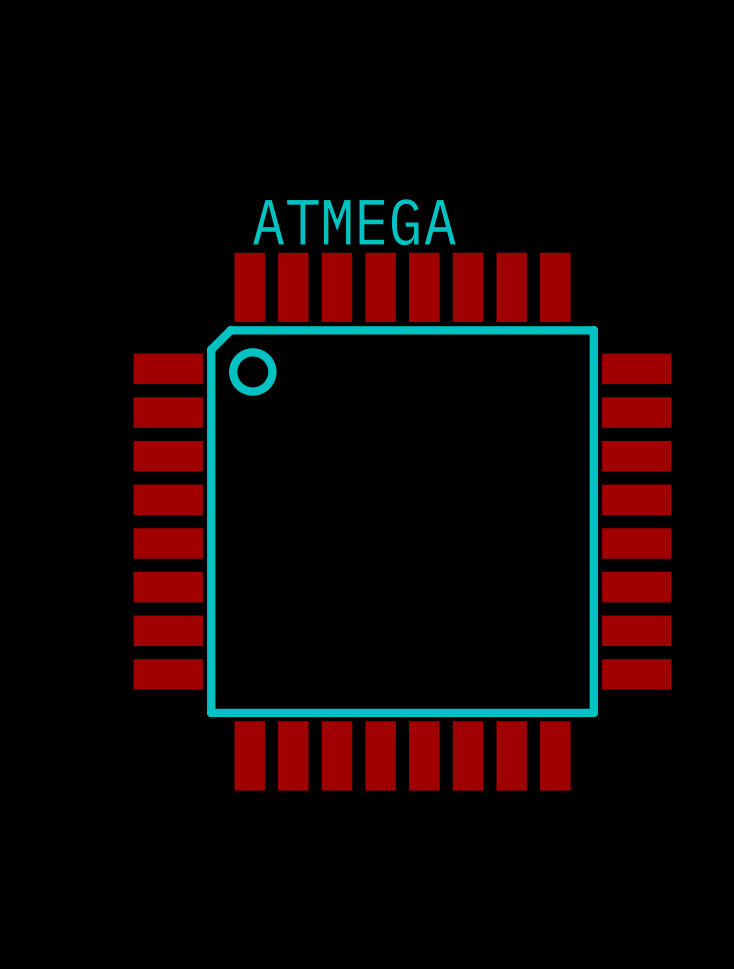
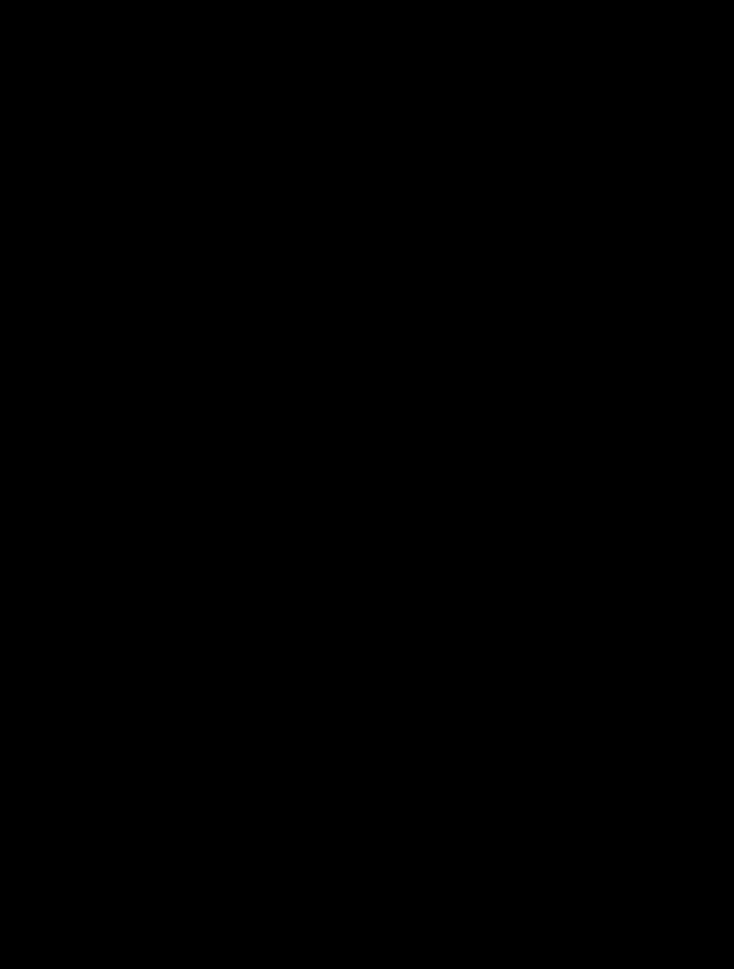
ATMEGA: (402, 521) -> none

